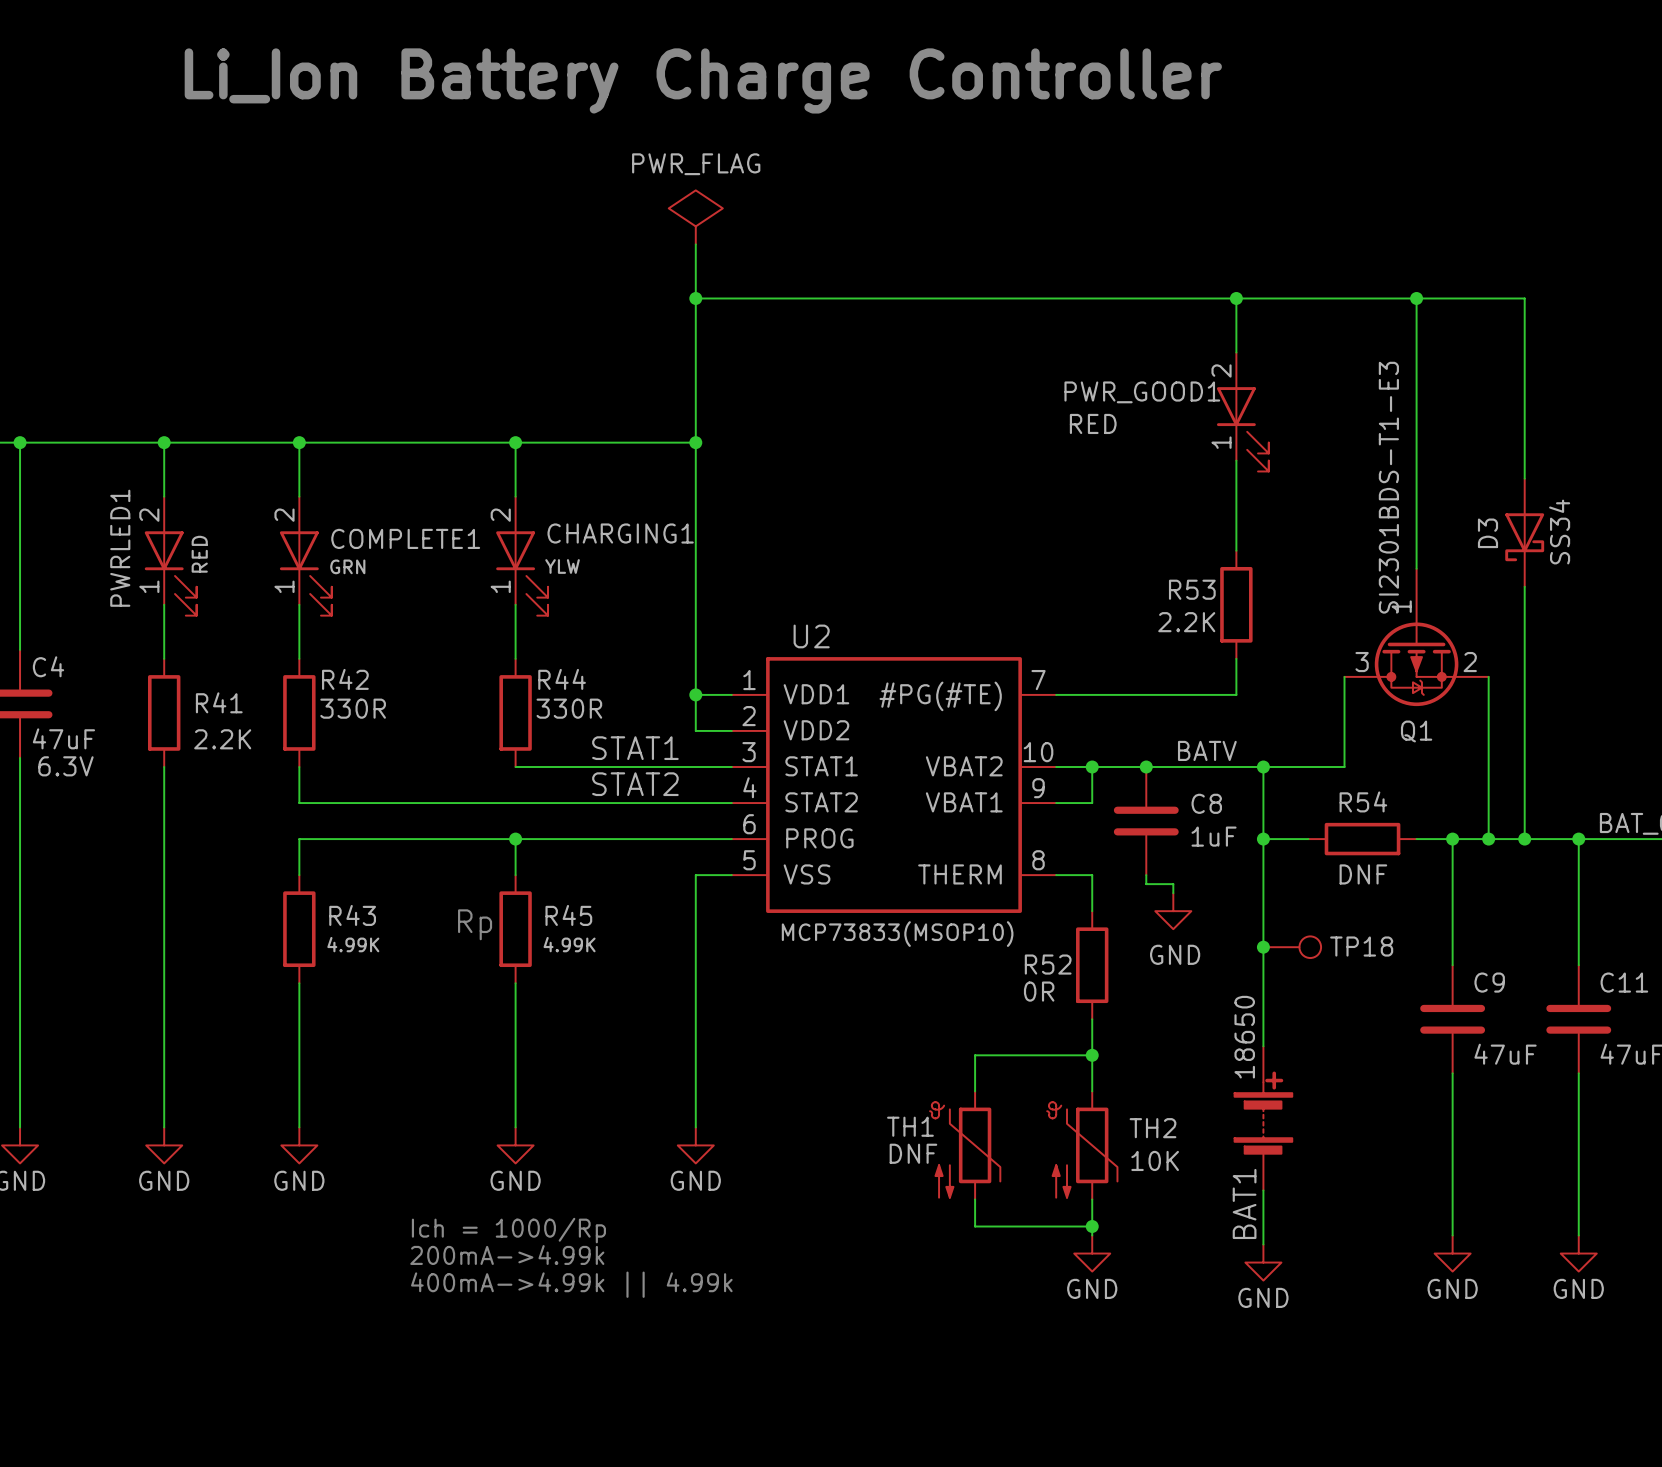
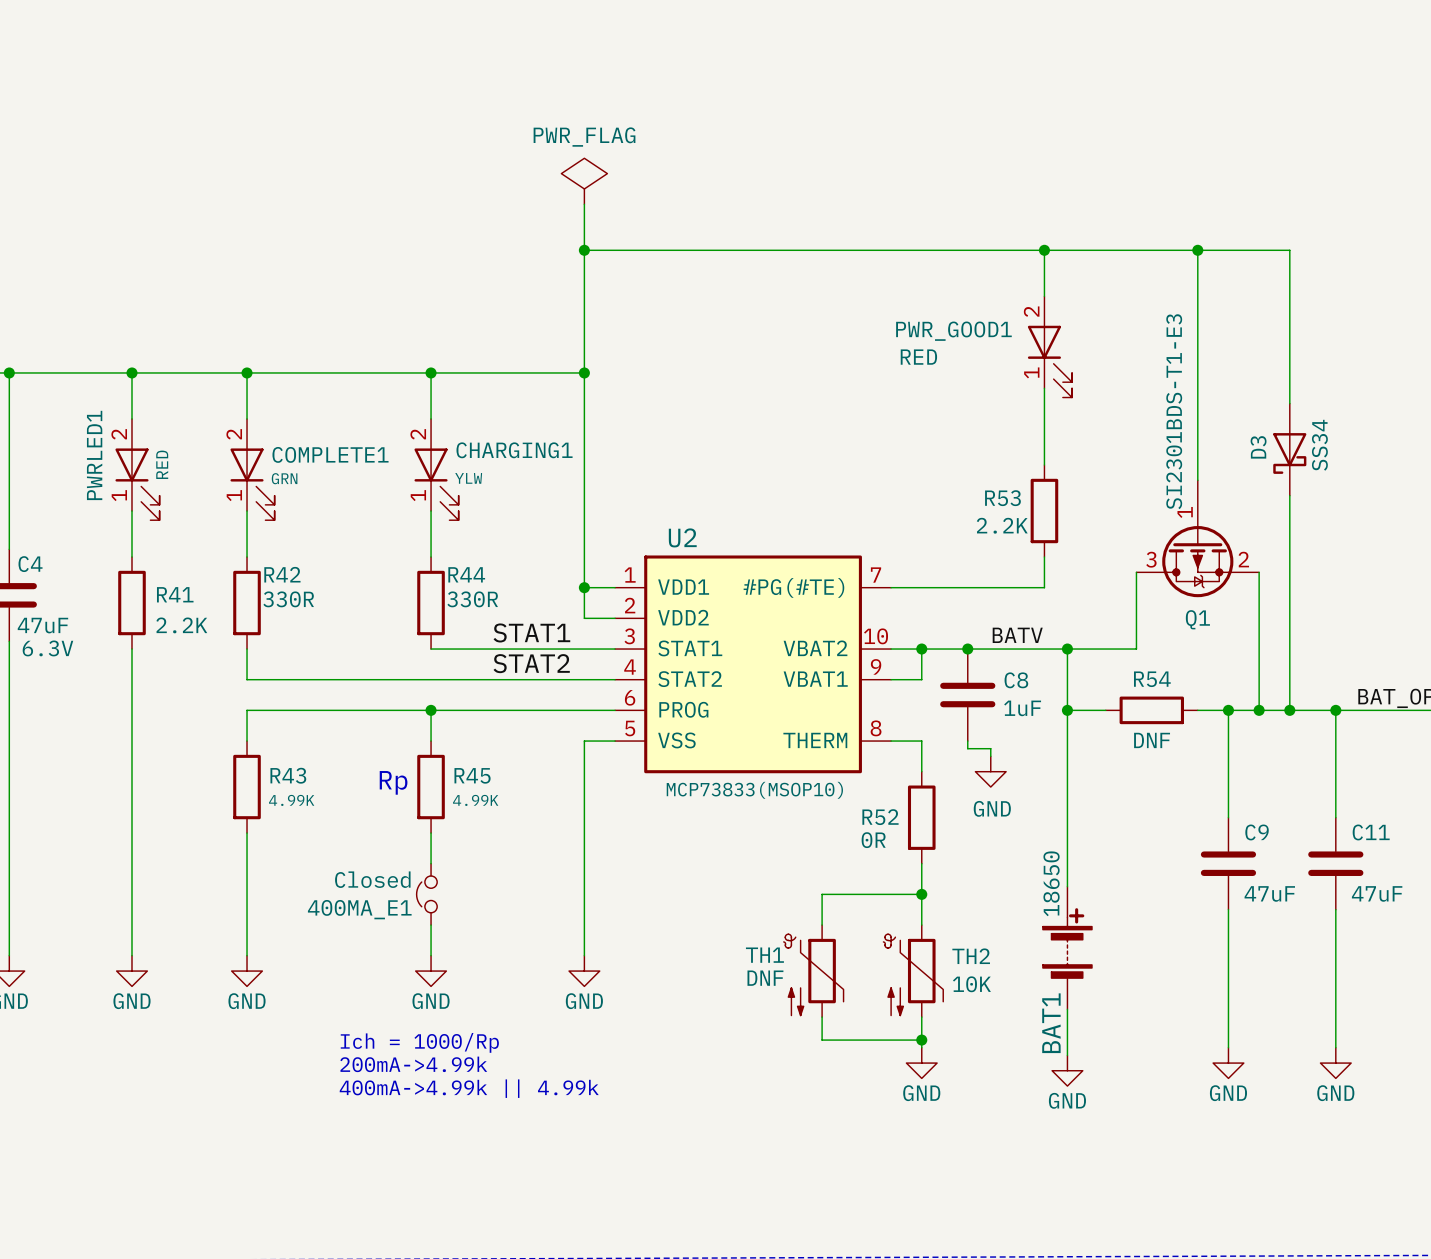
text: Li_Ion Battery Charge Controller (703, 80) -> none
junction: (1263, 947) -> none
TP18: (1292, 947) -> none
wire: (515, 1019) (515, 1091) -> none
400MA_E1: none -> Closed (426, 894)

